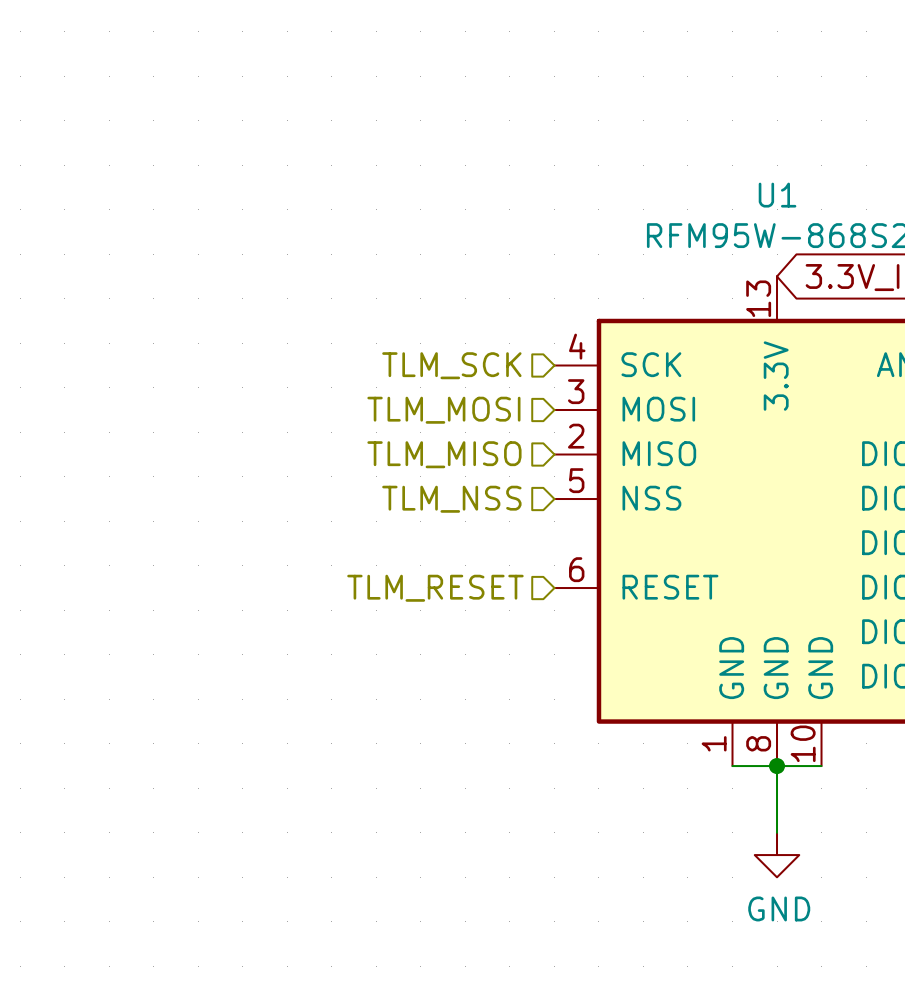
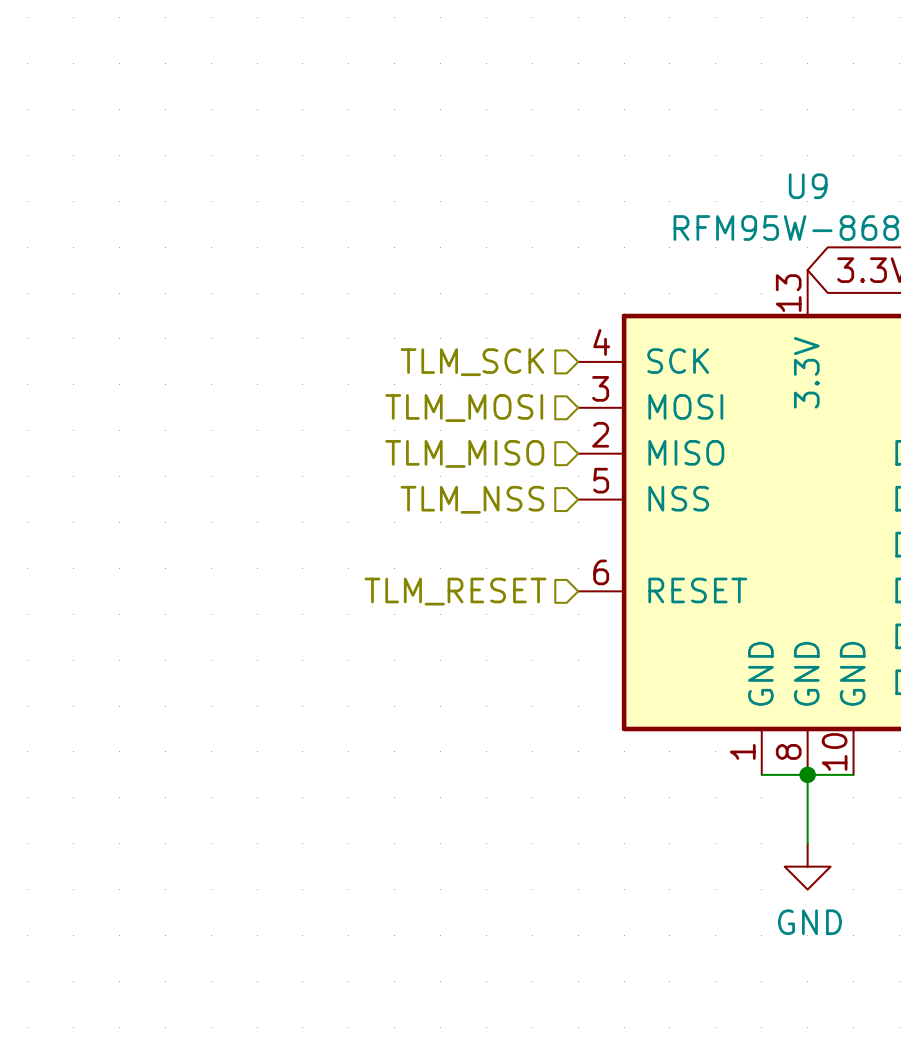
U1 name: U1 (777, 195) -> U9 (808, 186)

